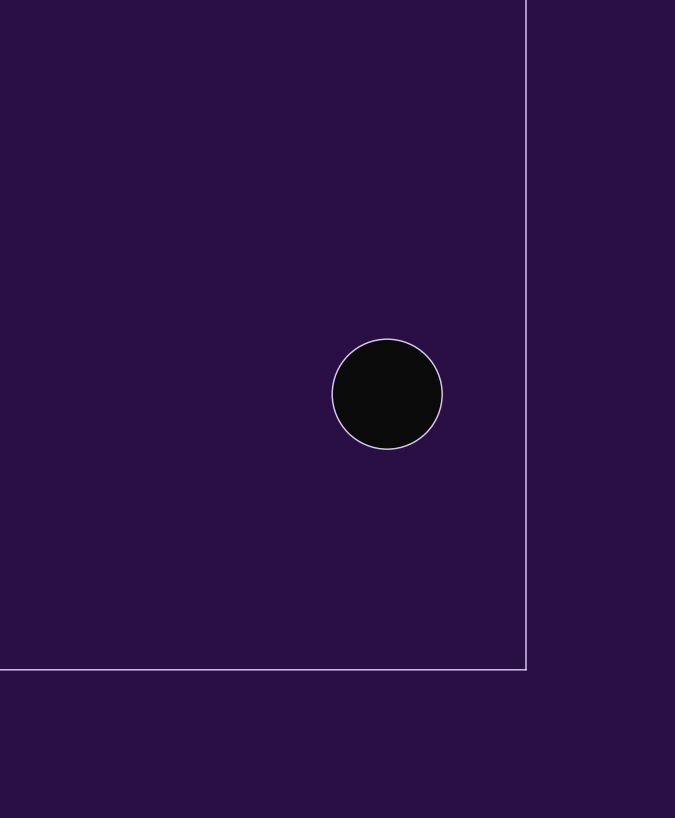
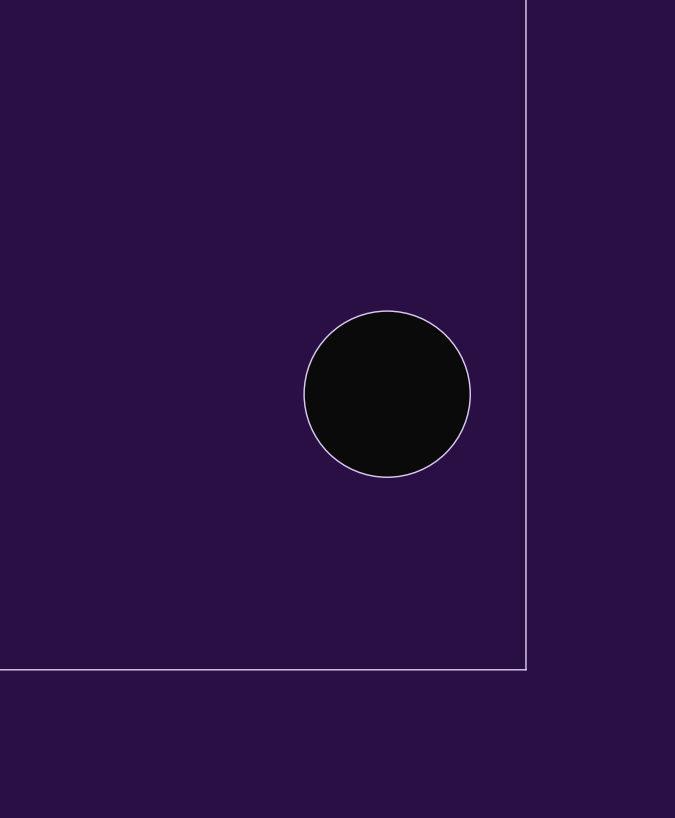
hole size: [332, 339, 443, 450] -> [304, 311, 471, 478]

